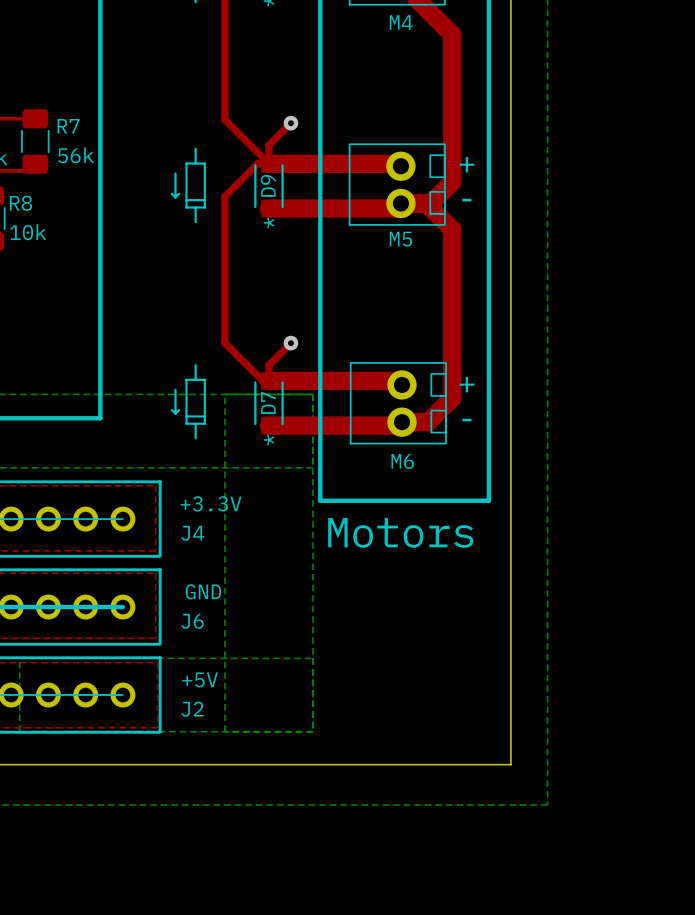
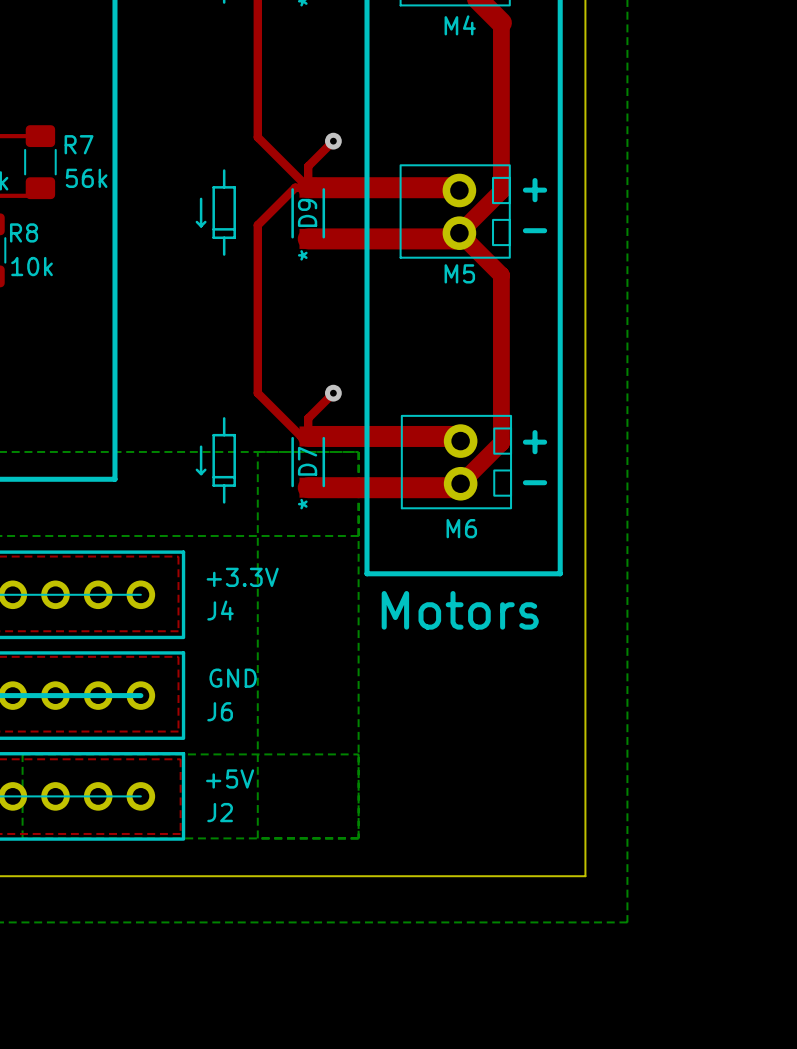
top track: (437, 19) (452, 34) (452, 181) (430, 203) (400, 203) -> none
top track: (426, 203) (452, 229) (452, 398) (428, 422) (402, 422) -> (501, 22) (501, 191) (459, 233) (501, 275) (501, 442) (460, 483)

